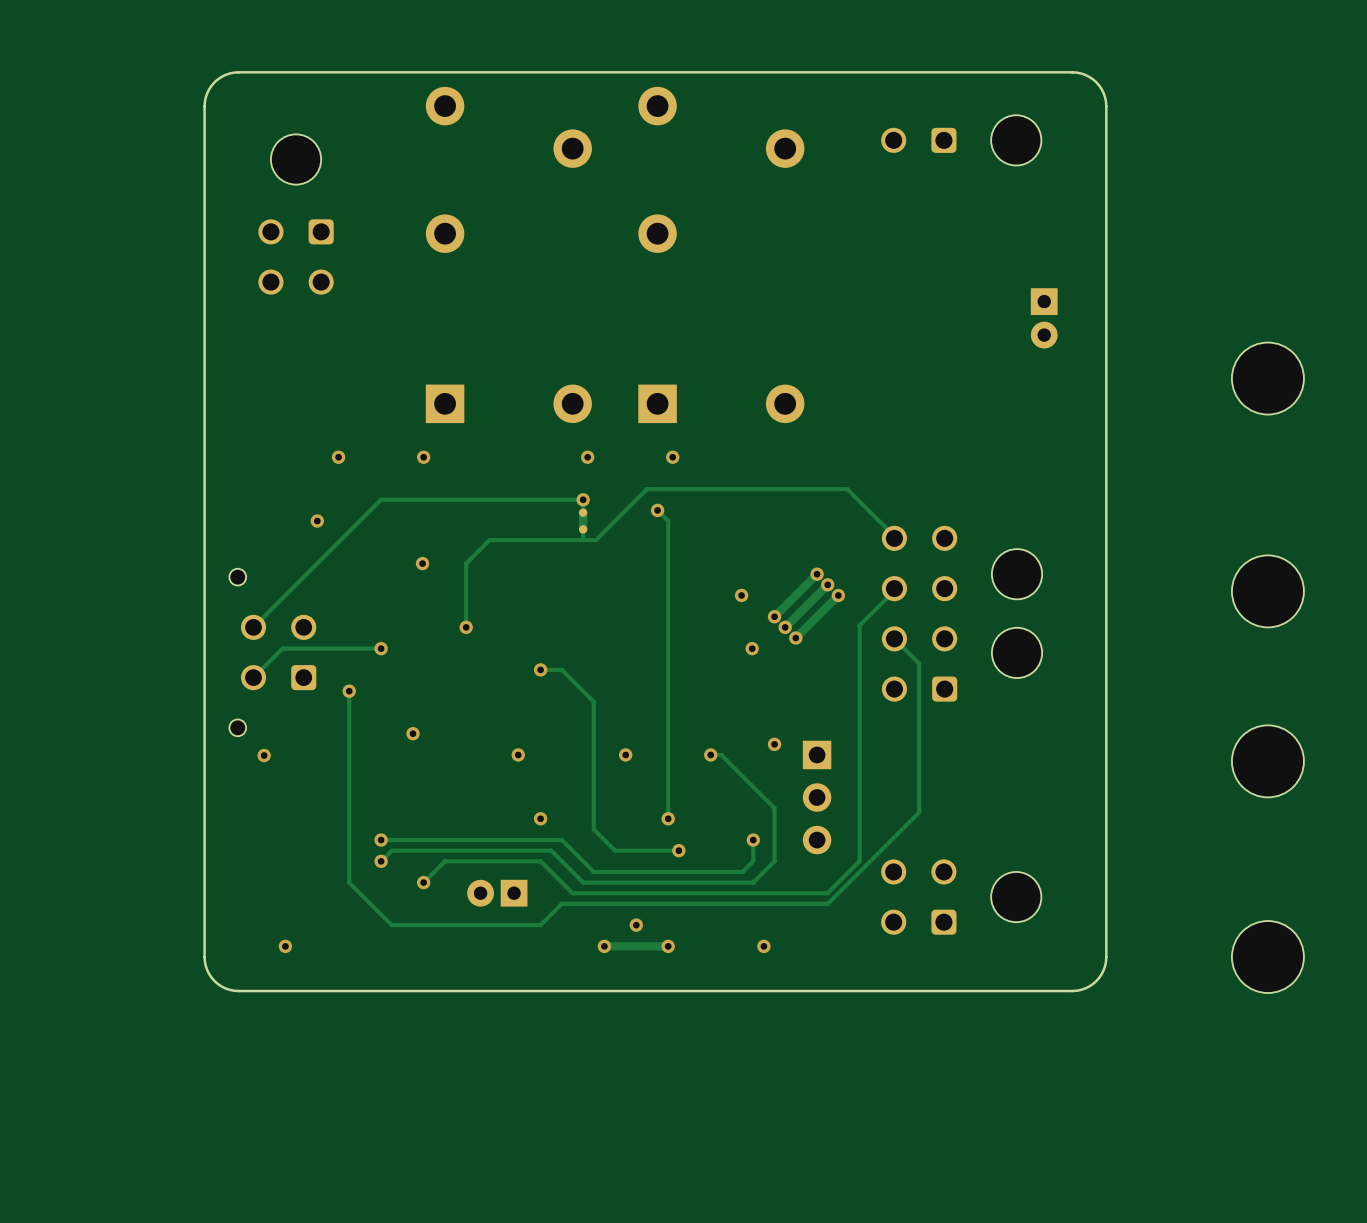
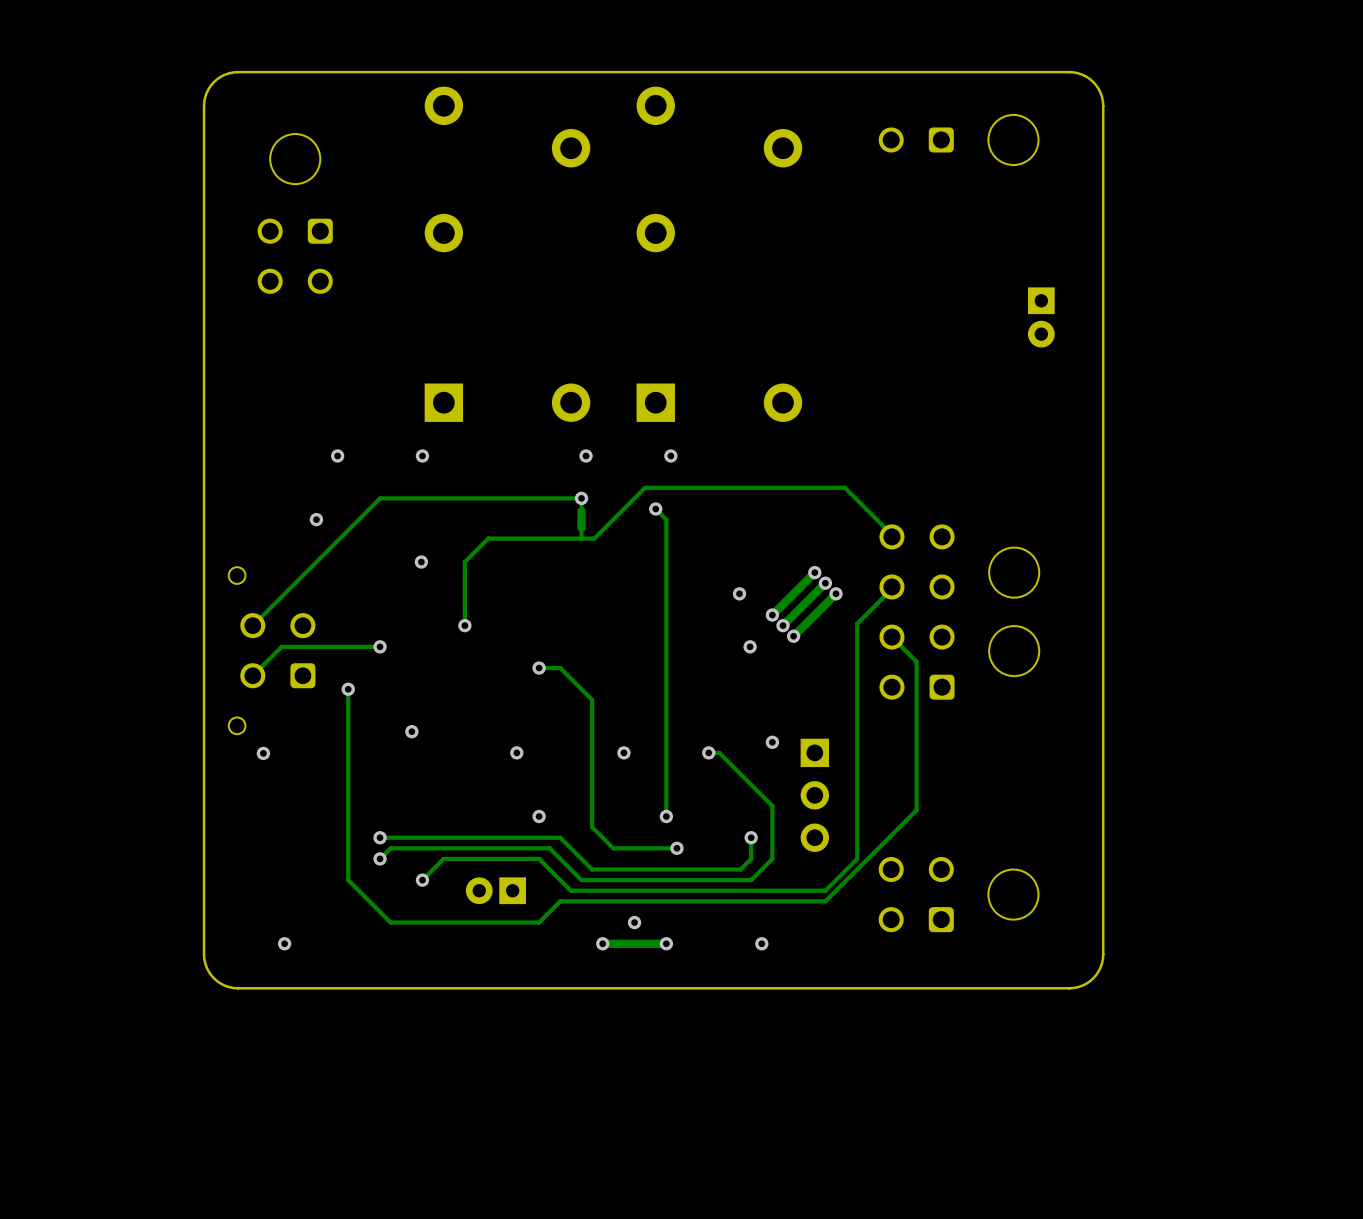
part: (1267, 378) -> none
part: (1267, 591) -> none
part: (1267, 761) -> none
part: (1267, 957) -> none

